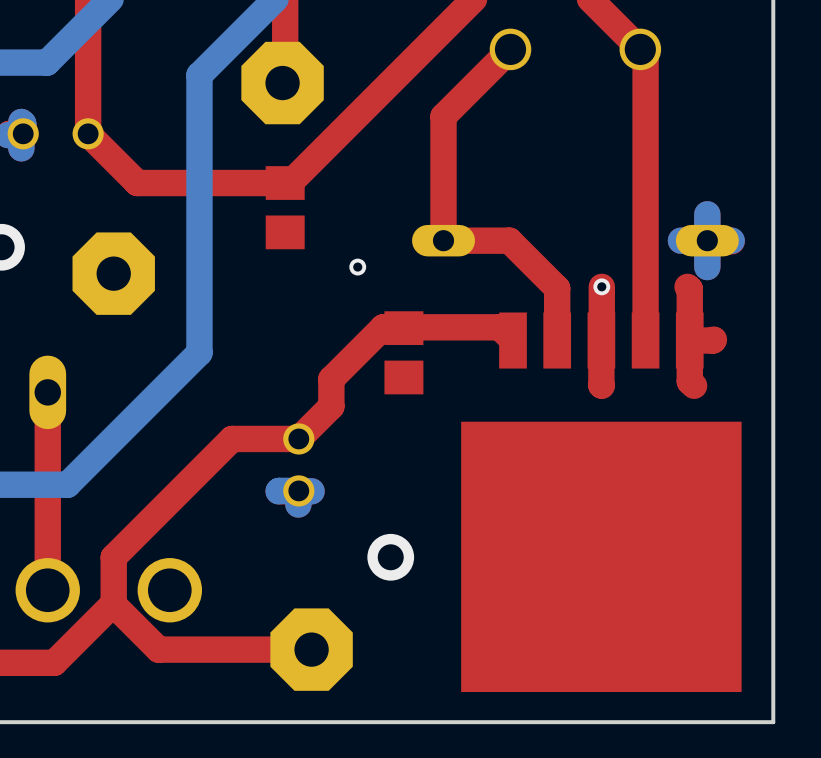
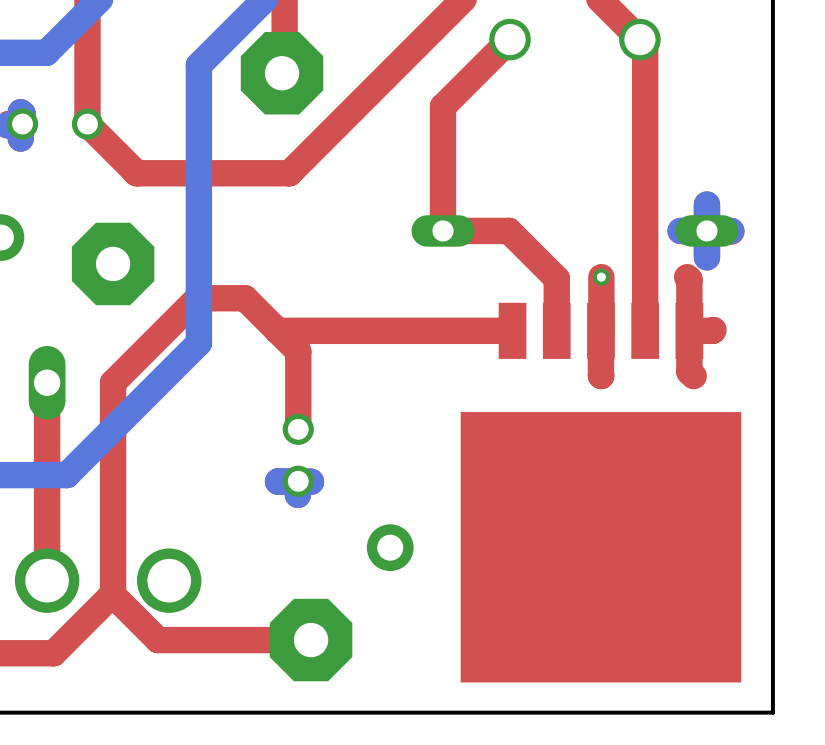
part: (285, 207) -> none
via: (357, 267) -> none
top track: (513, 340) (499, 327) (383, 327) (331, 379) (331, 406) (298, 438) (232, 438) (113, 557) -> (298, 429) (298, 351) (245, 298) (197, 298) (113, 382) (113, 547)
top track: none -> (512, 330) (277, 330)
part: (403, 352) -> none

